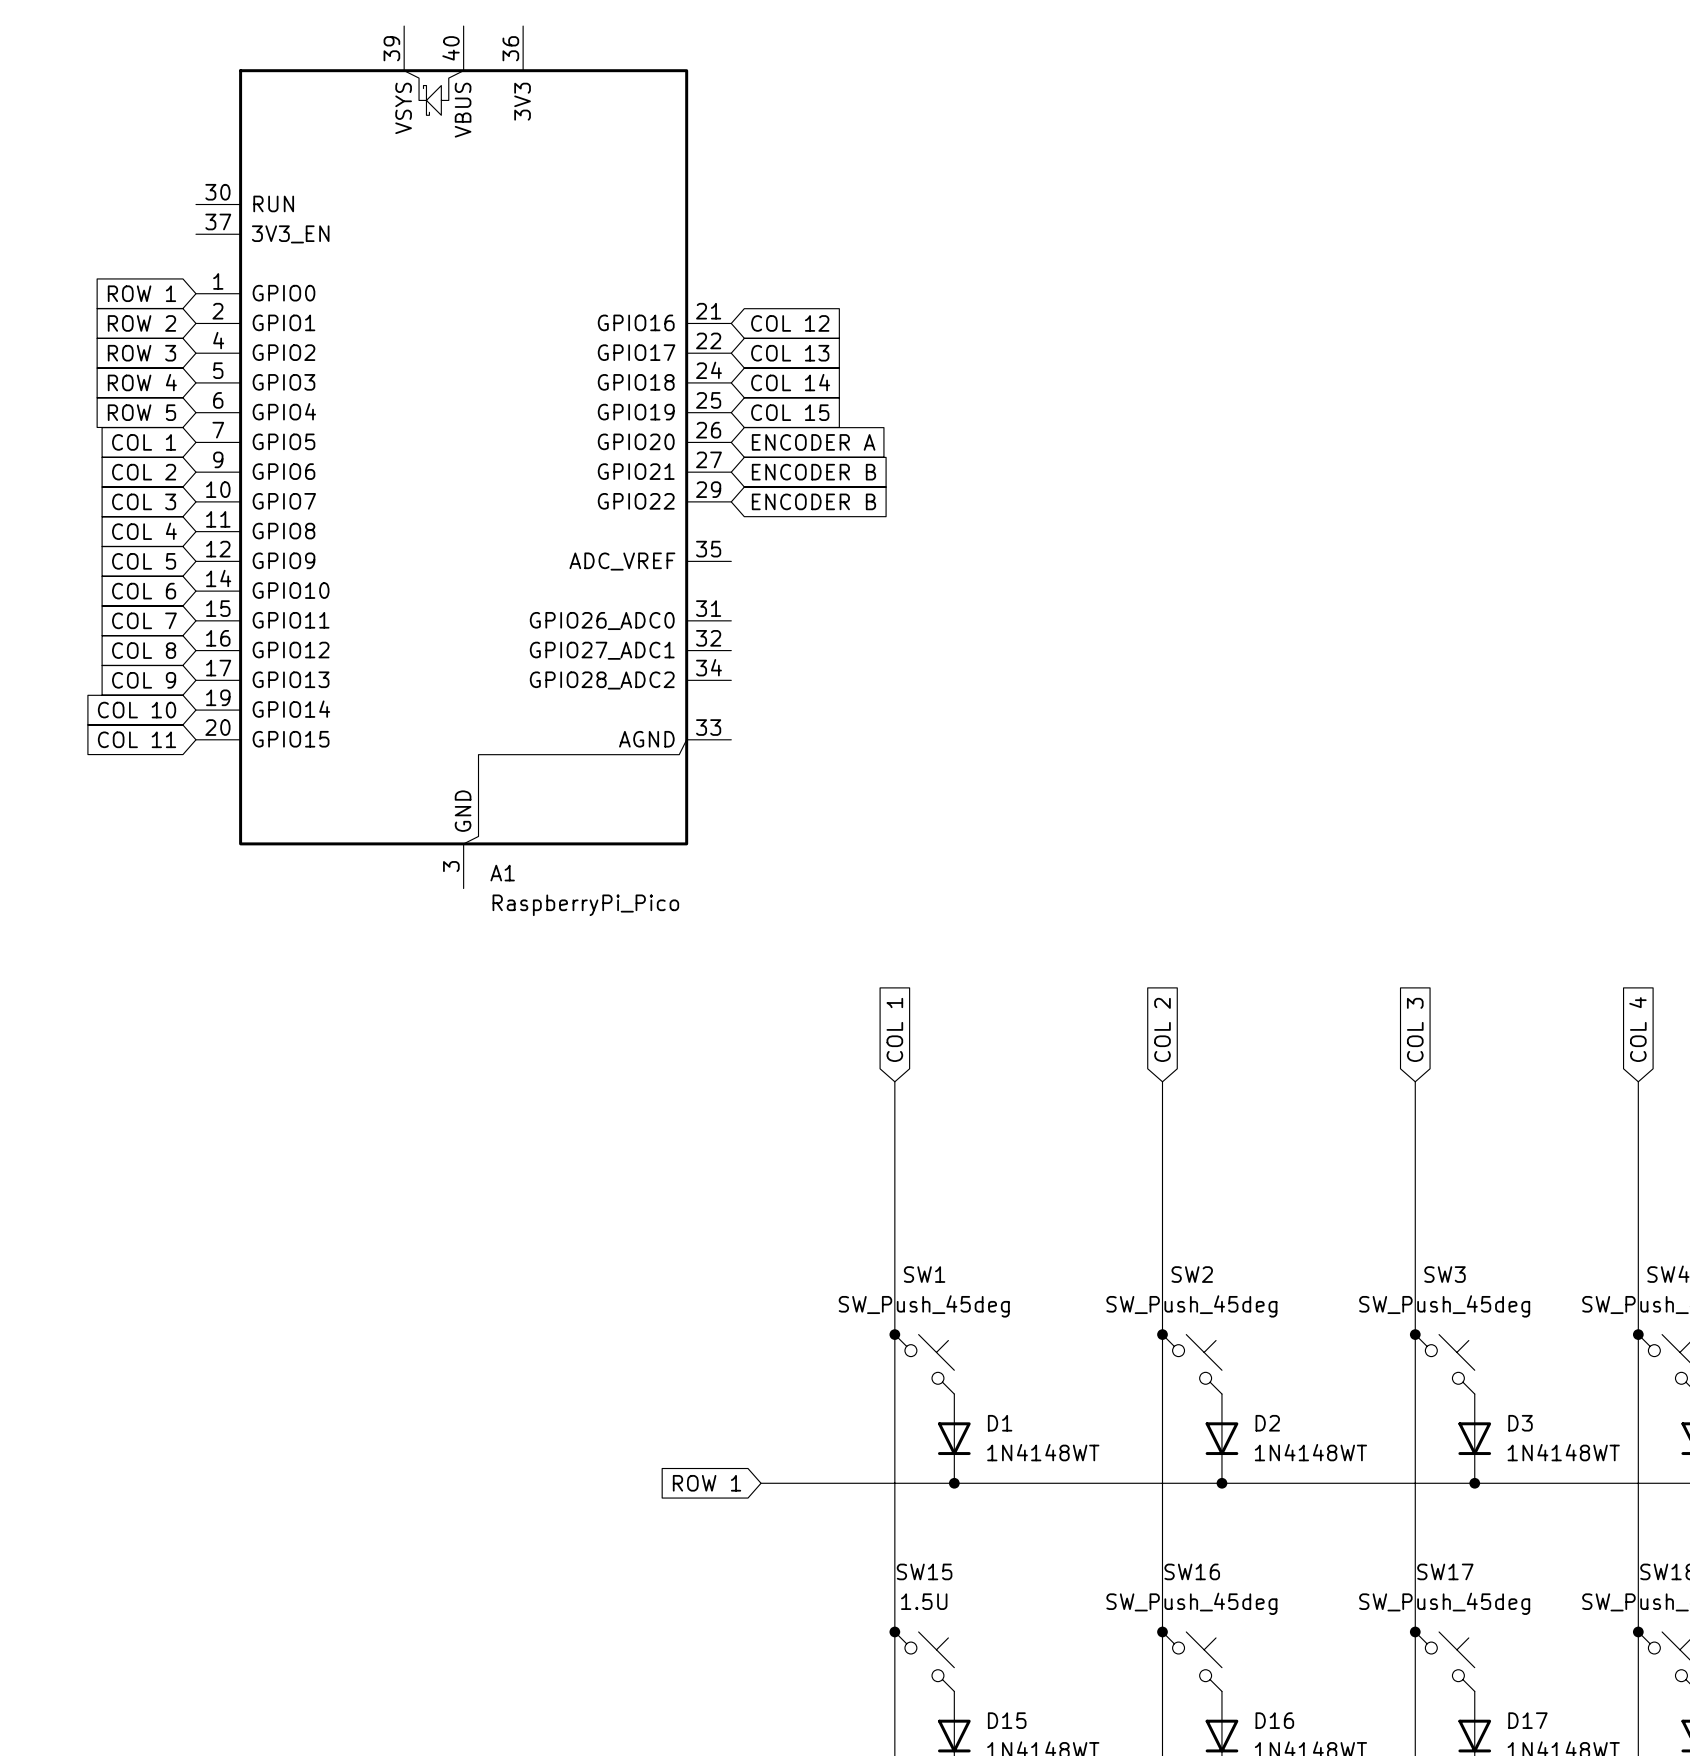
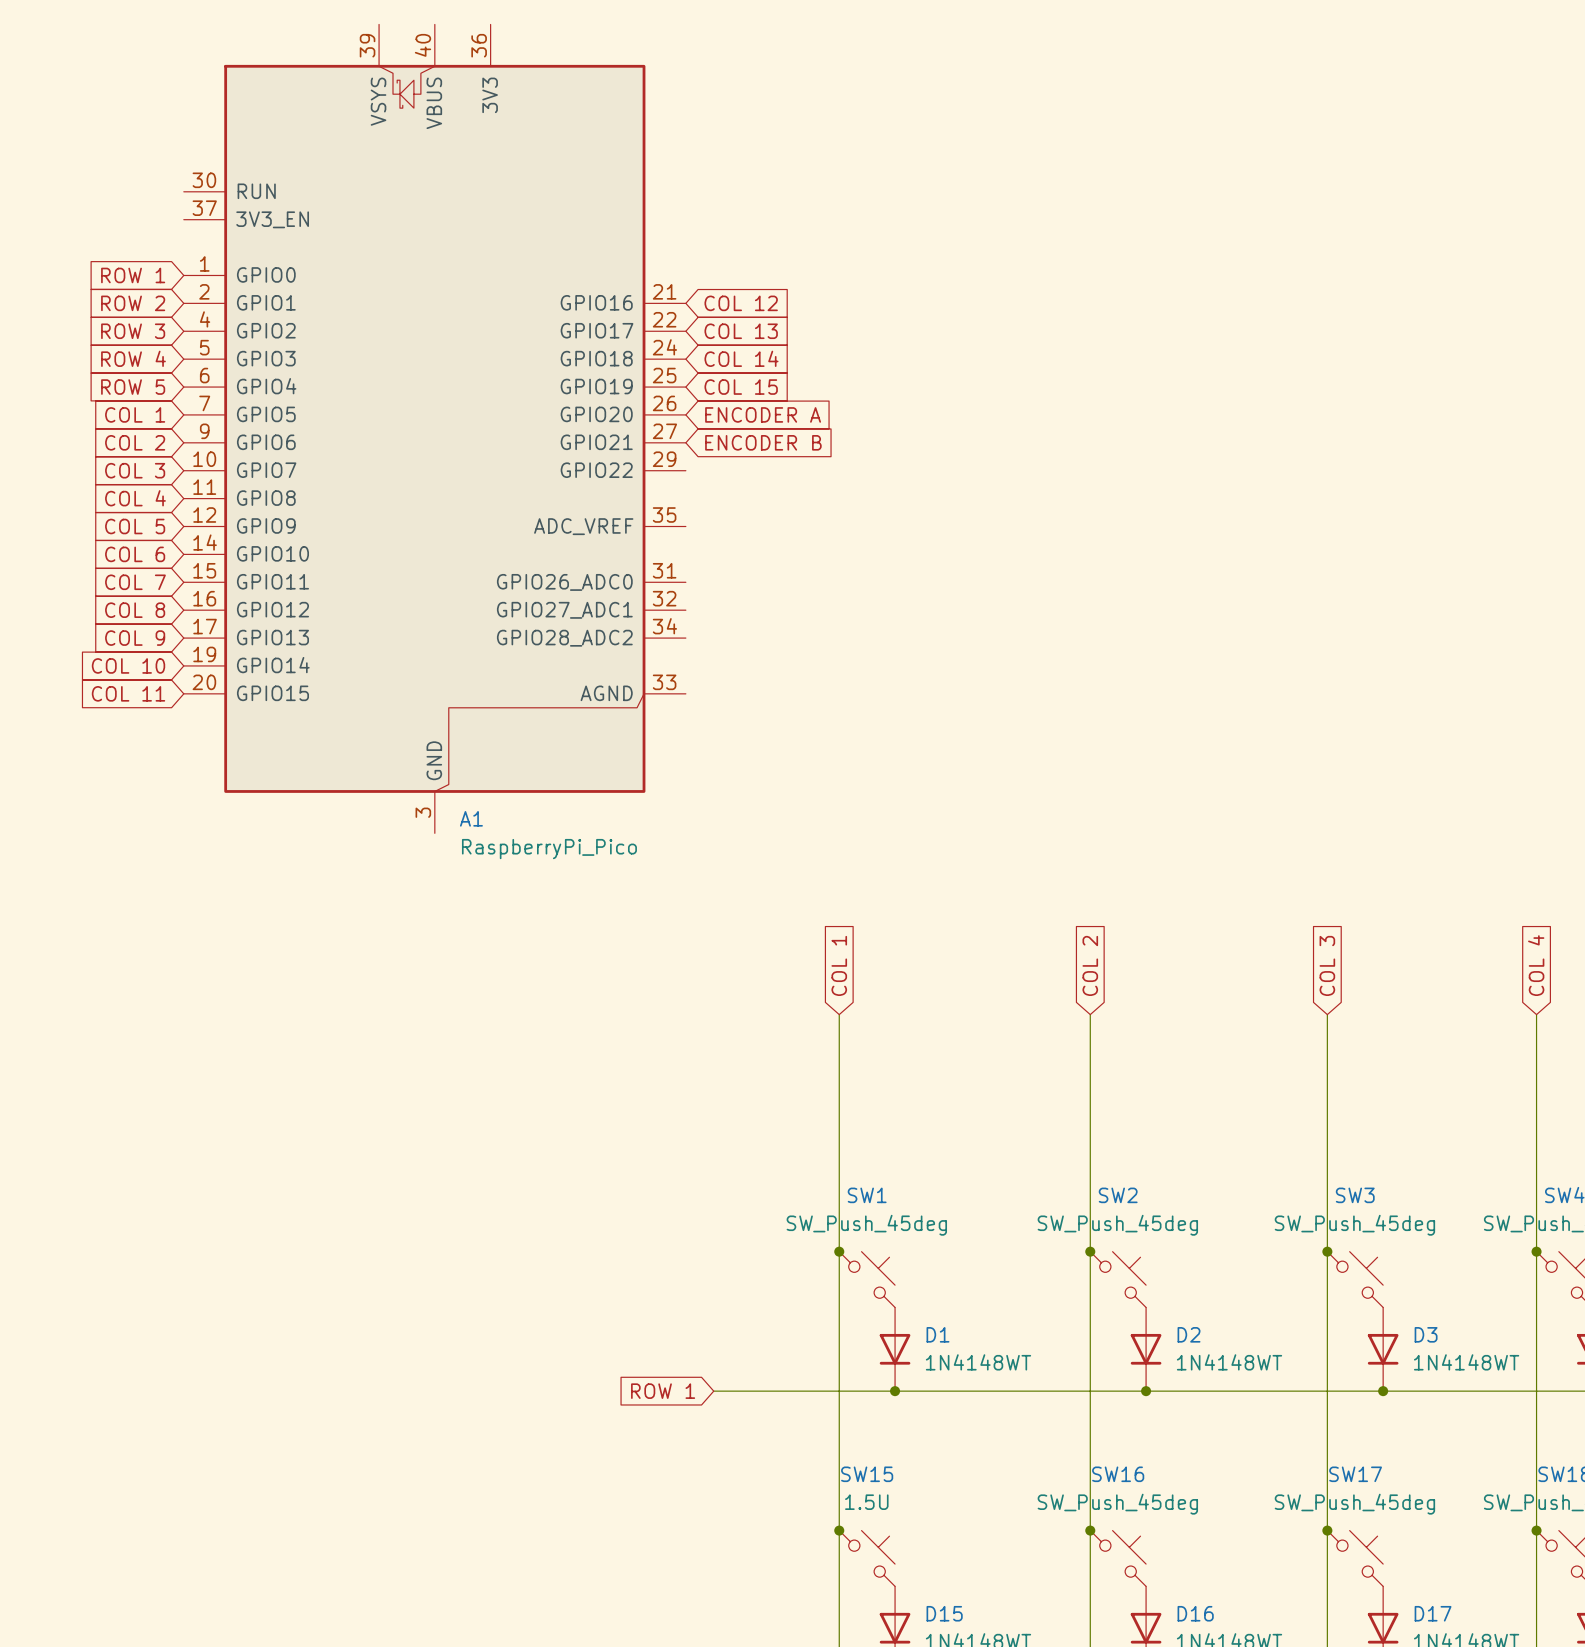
global label: ENCODER B (813, 501) -> none

